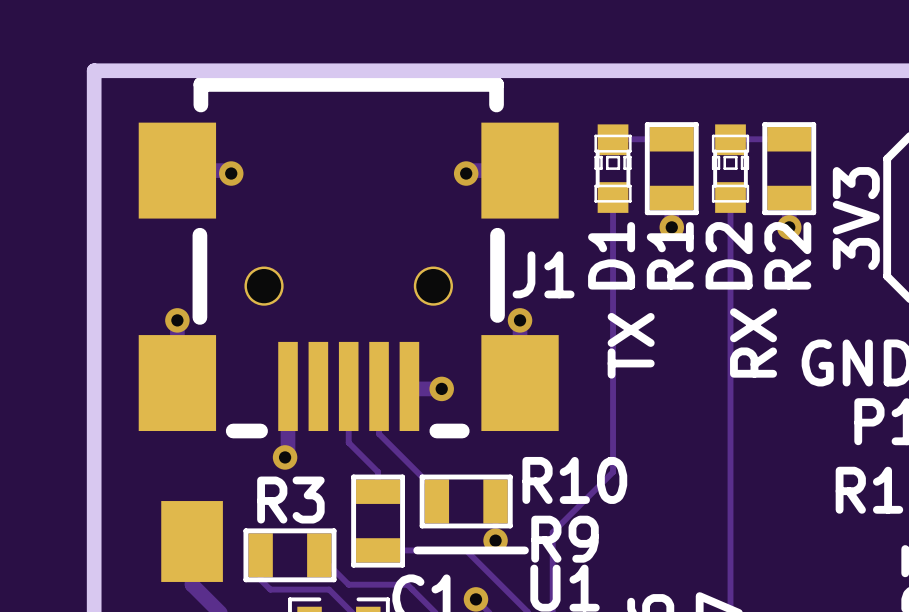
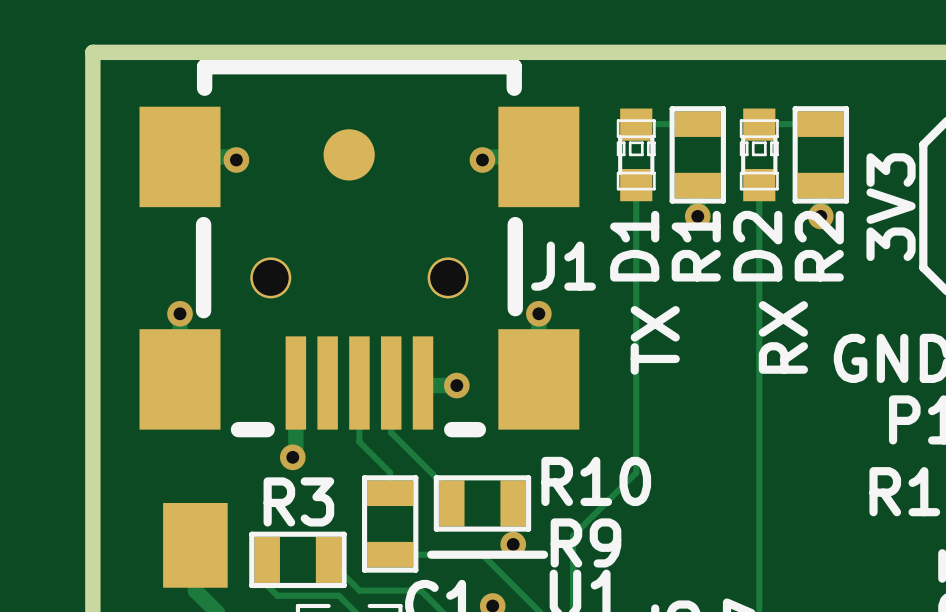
part: none -> (349, 154)

